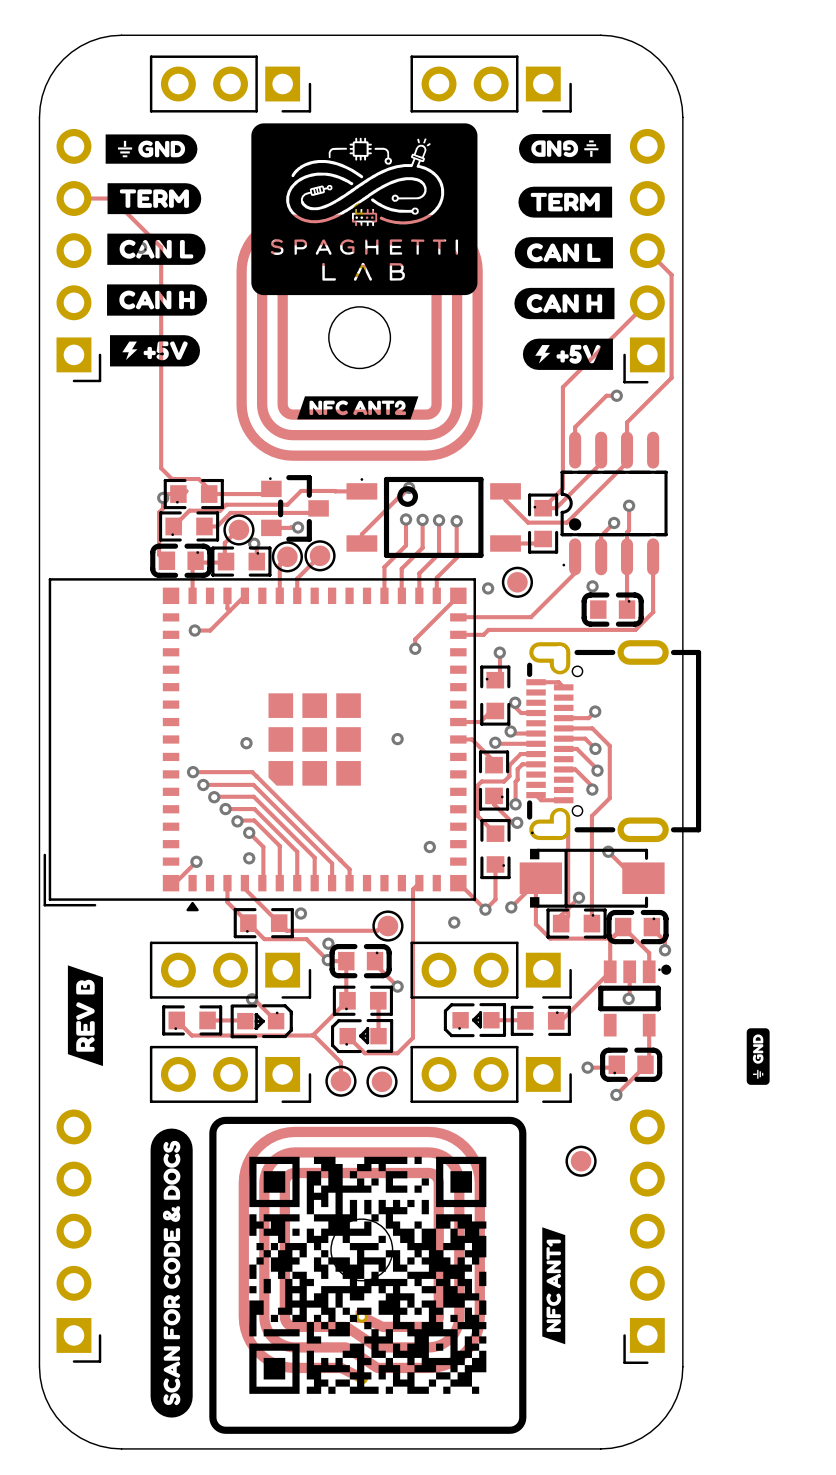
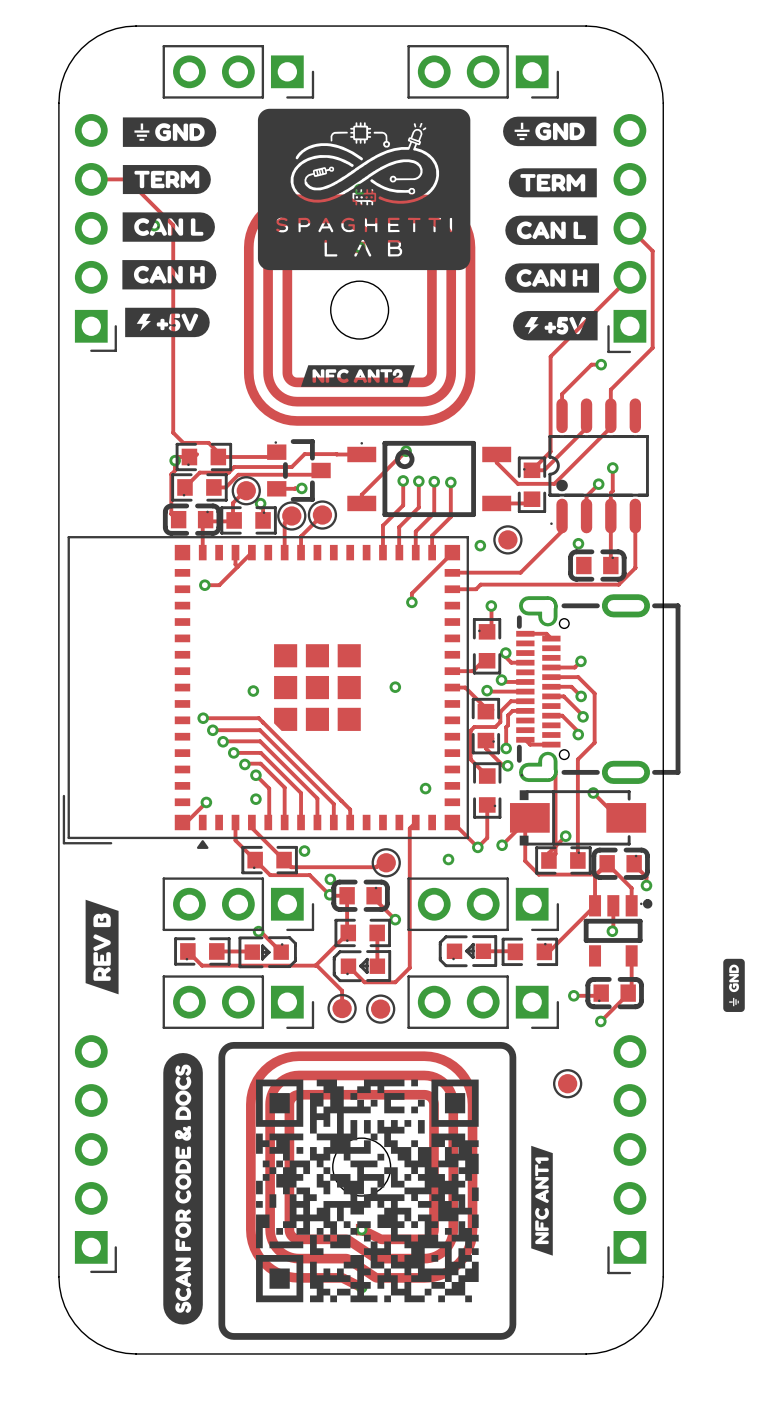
drawing shape: [105, 134, 198, 164] -> [122, 117, 217, 147]
drawing shape: [518, 134, 611, 164] -> [503, 116, 597, 147]

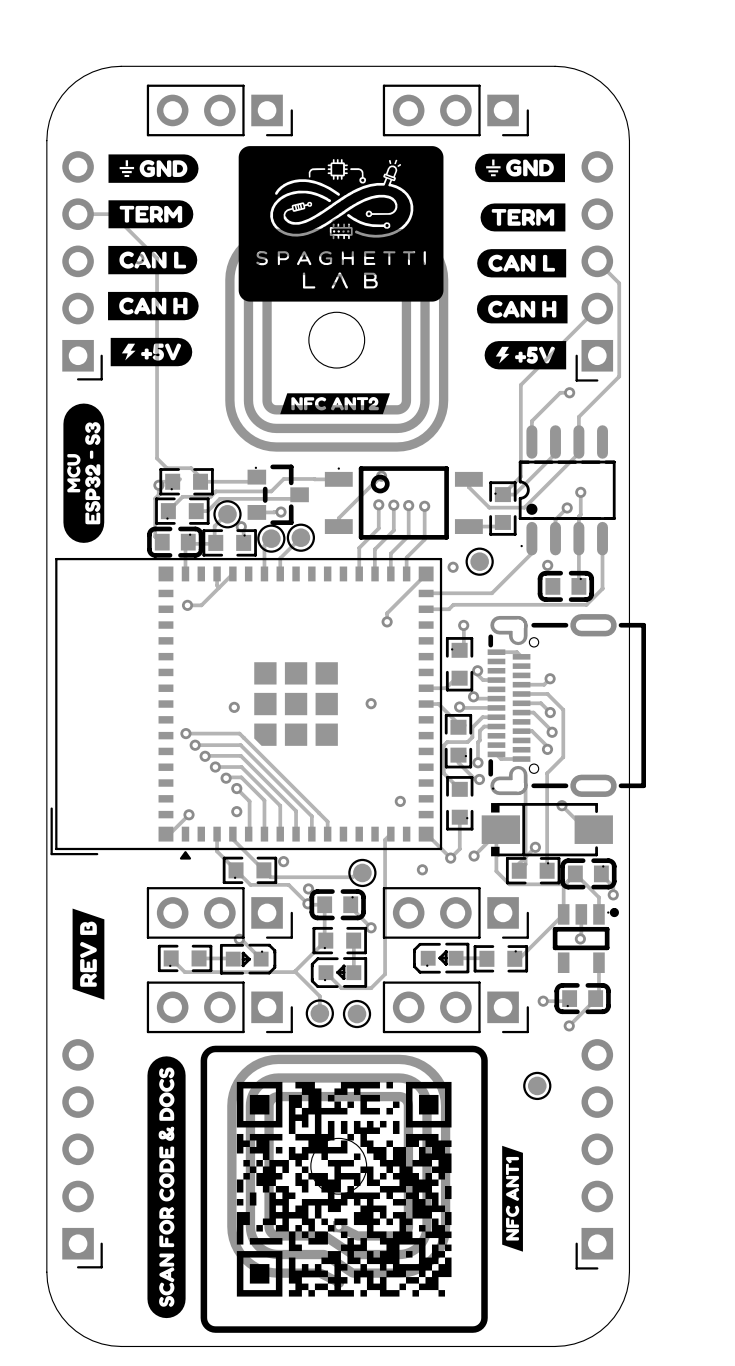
drawing: none -> [63, 403, 105, 543]
drawing: [723, 958, 745, 1012] -> none

